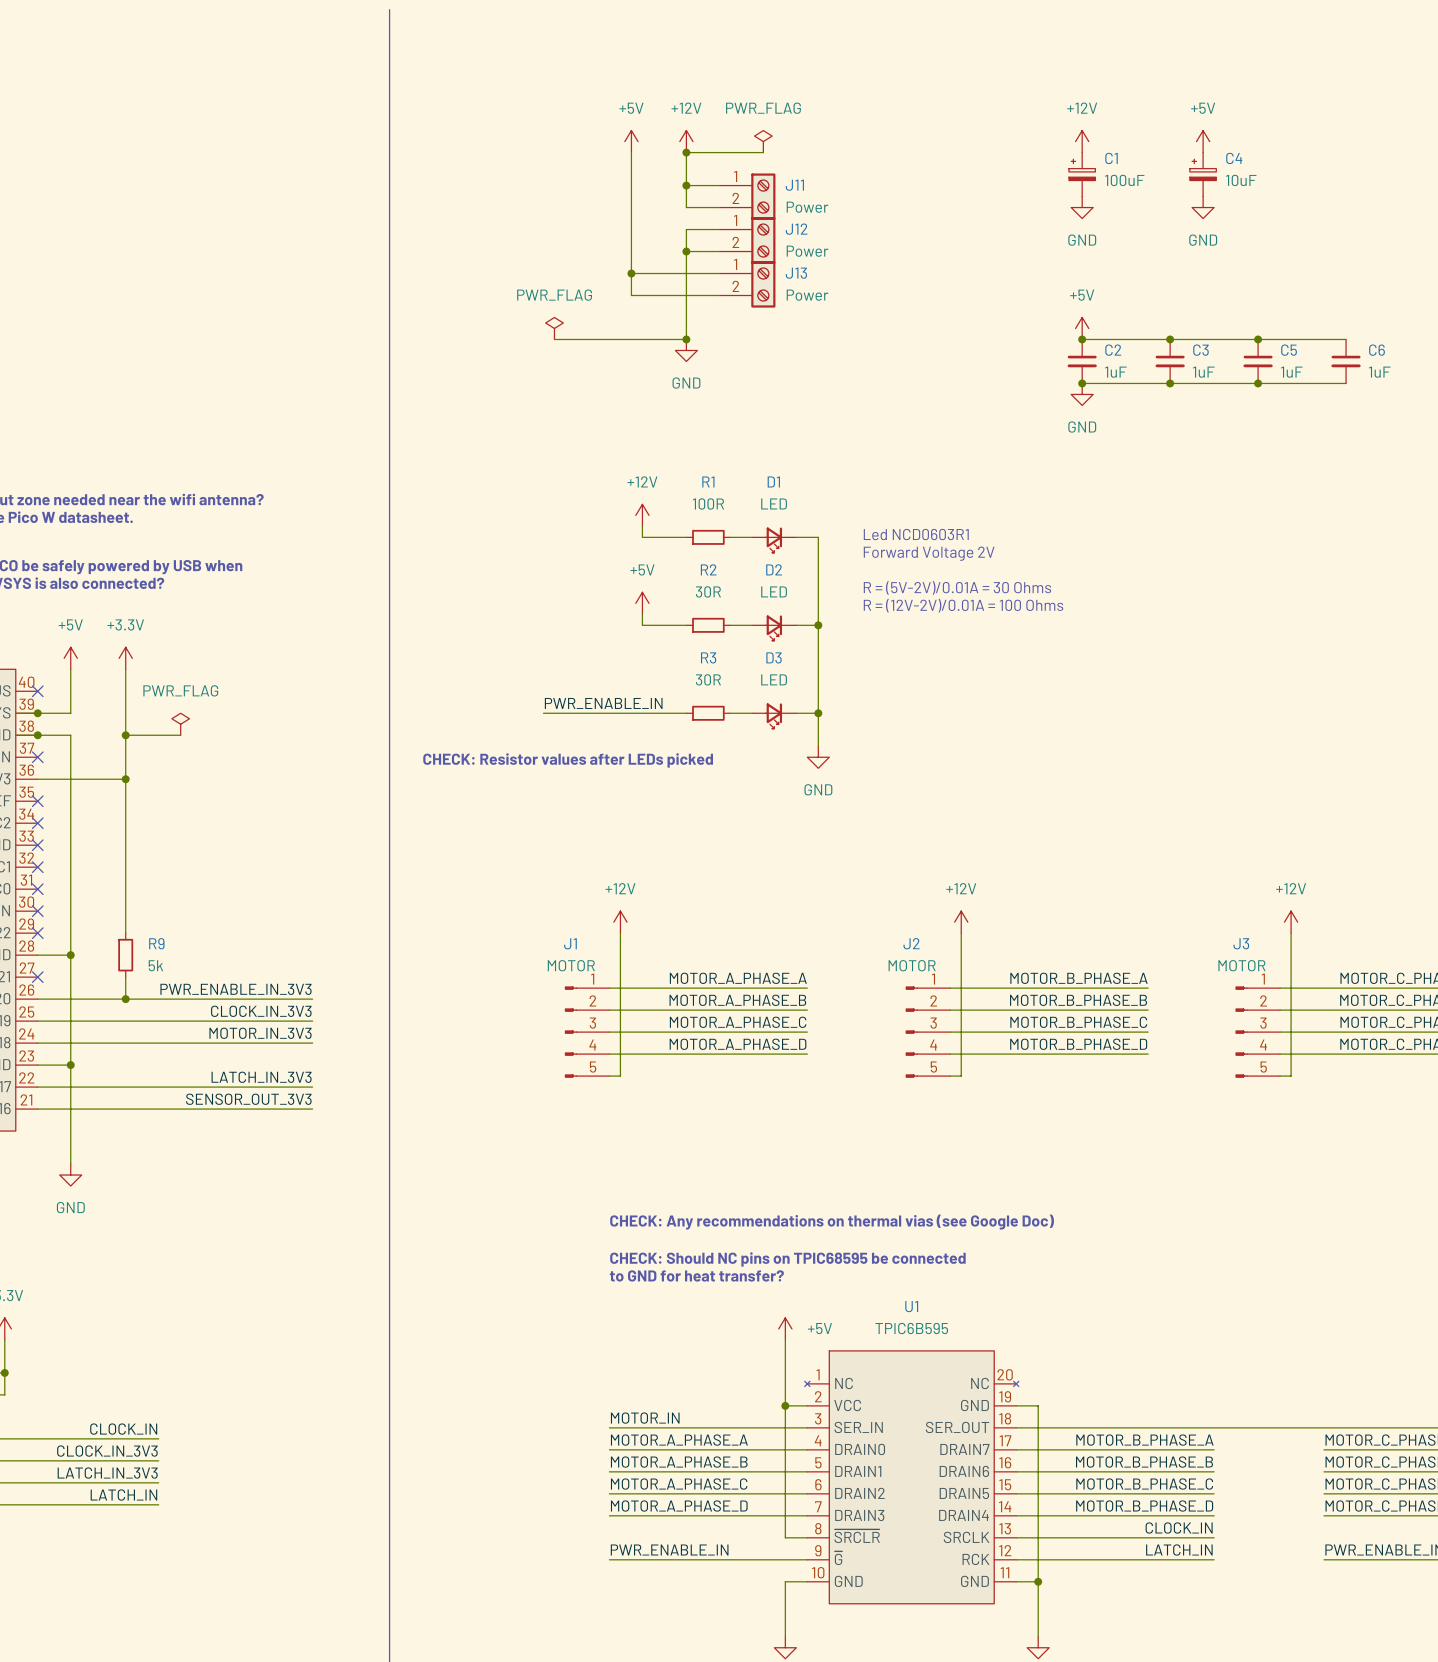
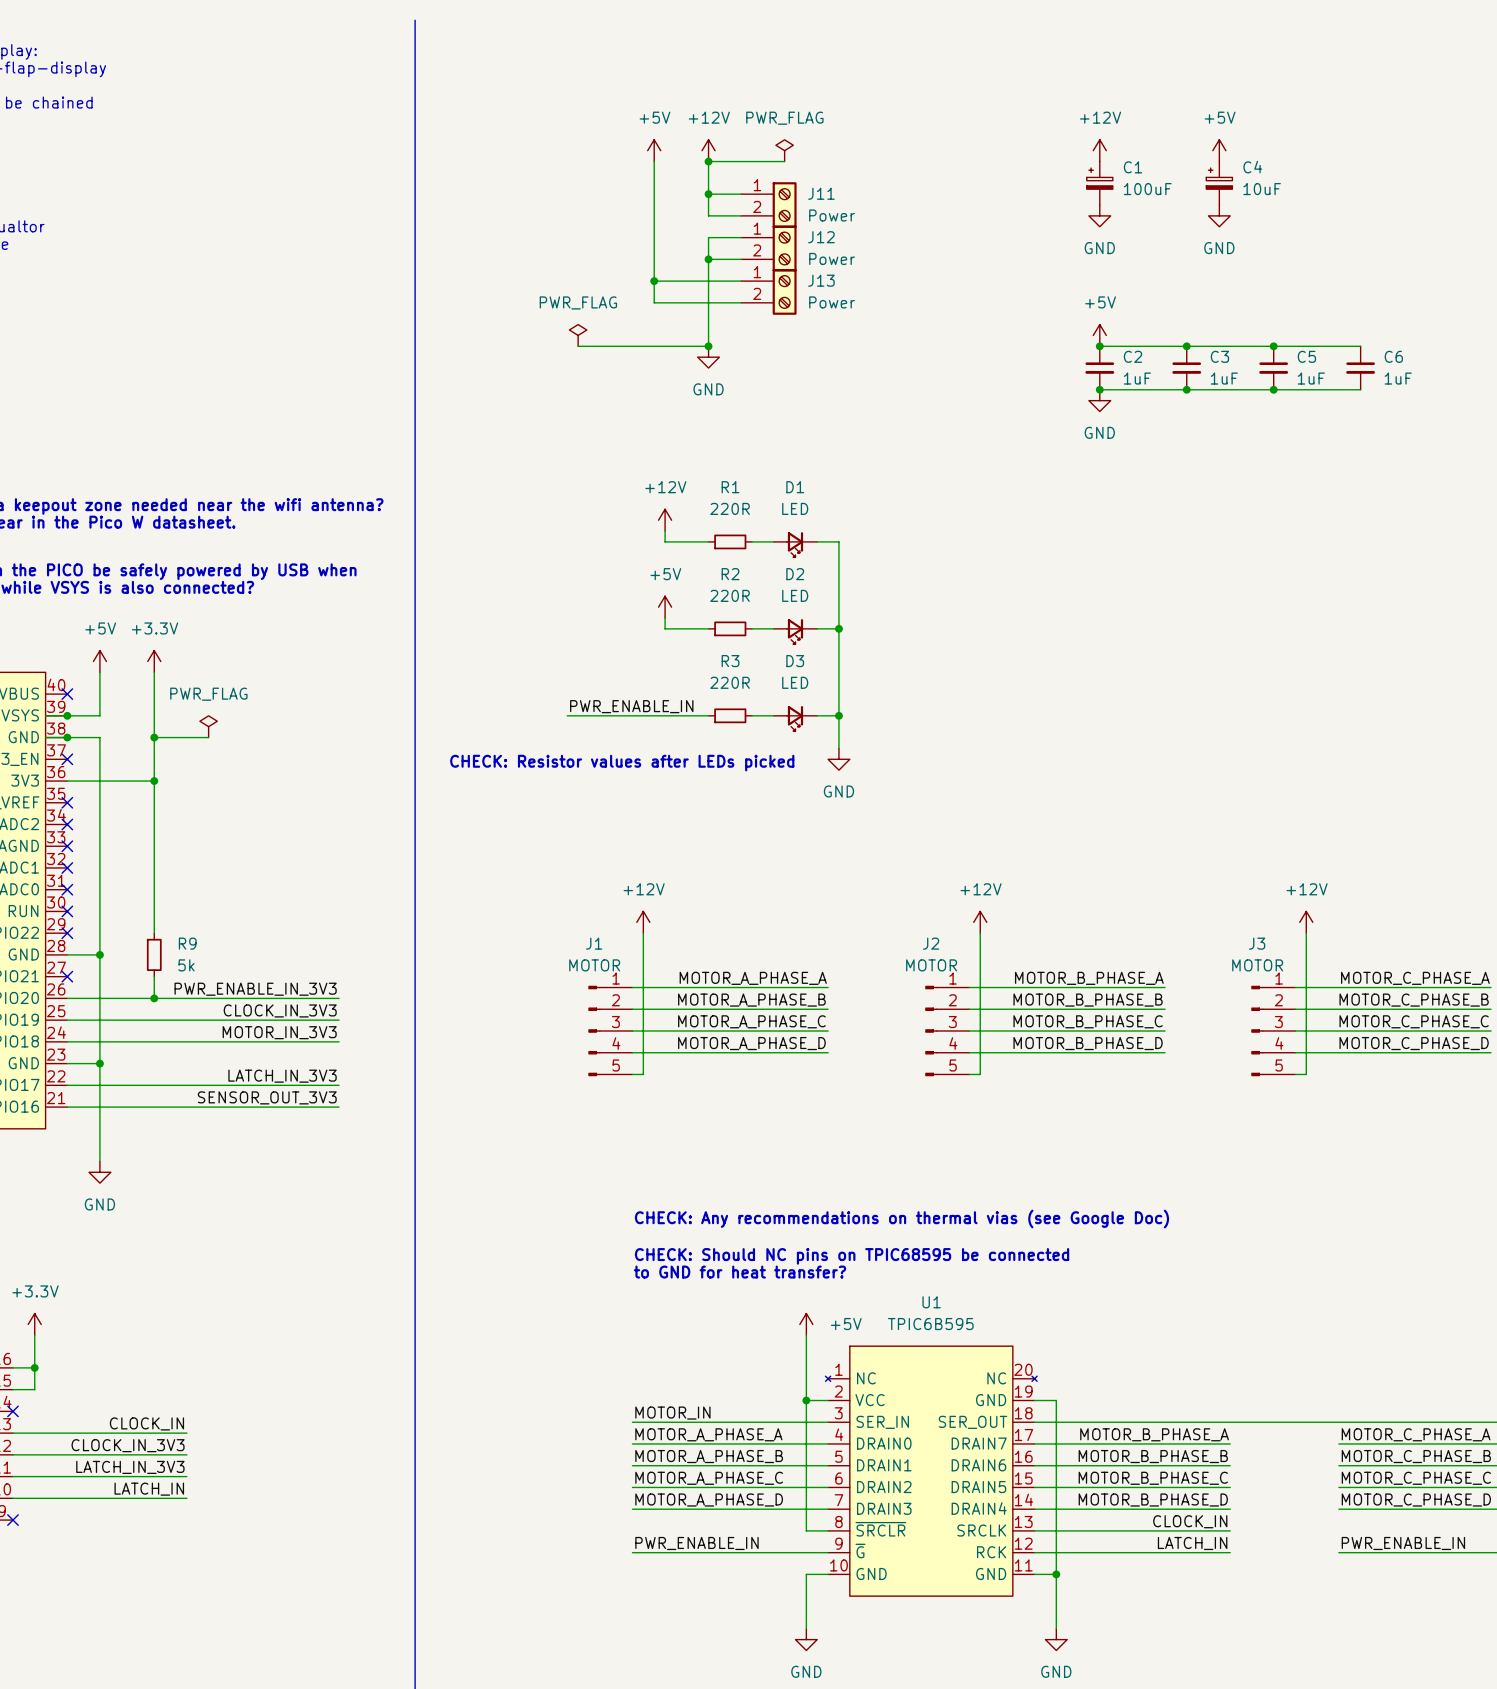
R1 value: 100R (708, 503) -> 220R (730, 508)
text: Led NCD0603R1 (916, 534) -> none
text: Forward Voltage 2V (929, 553) -> none
text: R = (5V-2V)/0.01A = 30 Ohms (957, 587) -> none
R2 value: 30R (708, 591) -> 220R (730, 595)
text: R = (12V-2V)/0.01A = 100 Ohms (963, 605) -> none
R3 value: 30R (708, 679) -> 220R (730, 682)

